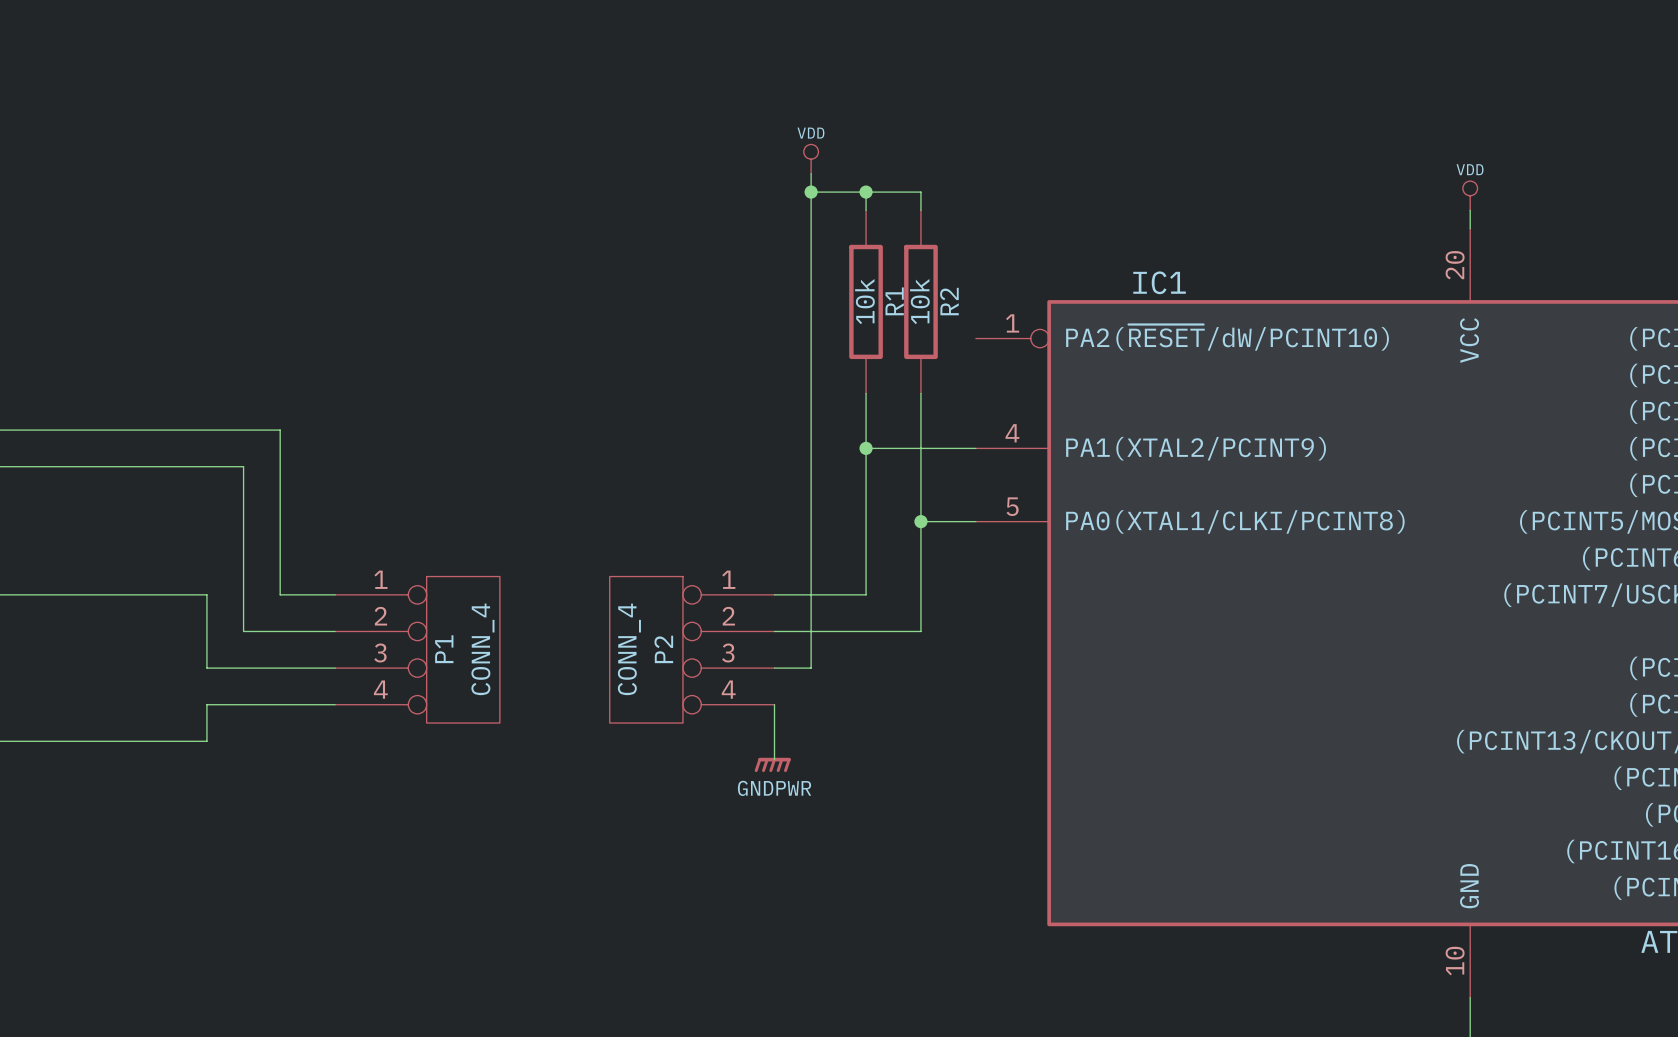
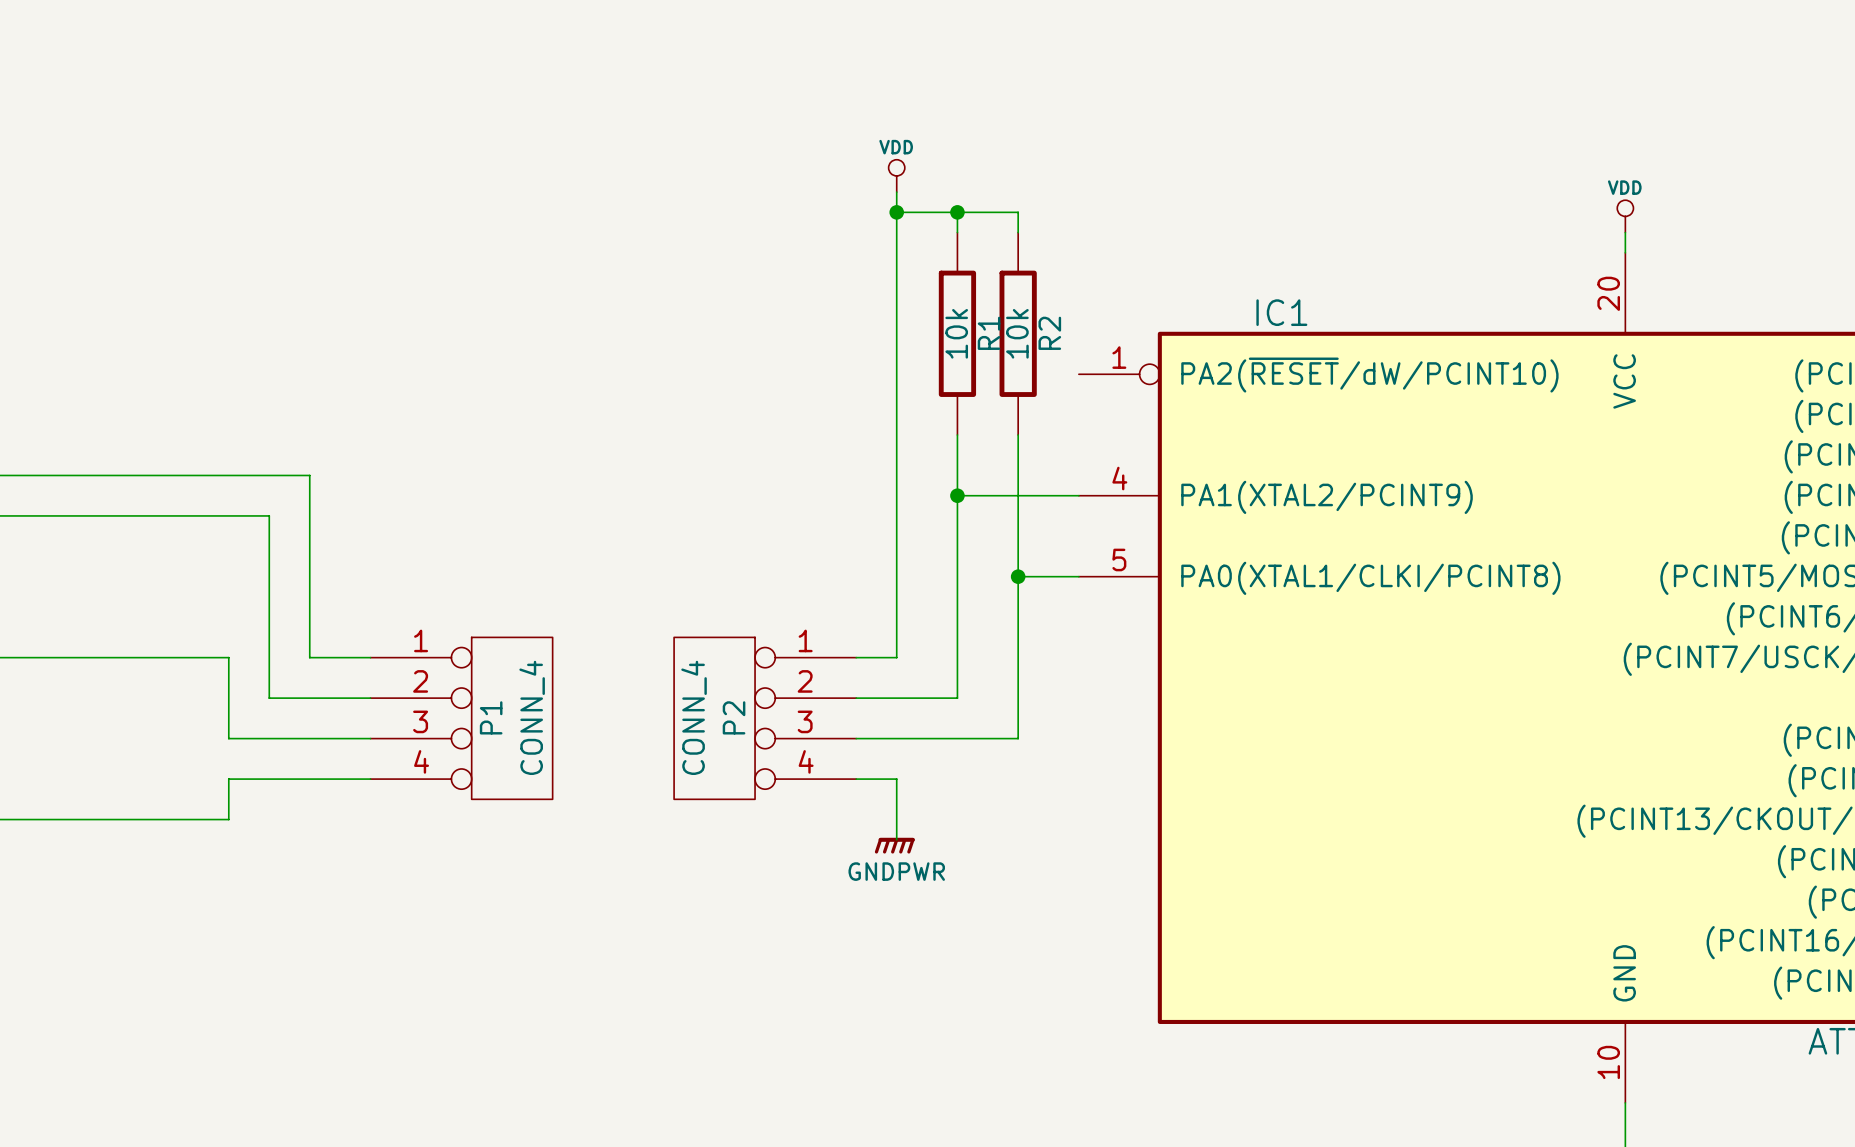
wire: (866, 594) (811, 594) (811, 668) -> (957, 657) (957, 698)
wire: (866, 631) (920, 631) -> (896, 738) (1018, 738) (1018, 698)
wire: (774, 704) (774, 759) -> (856, 779) (896, 779) (896, 839)
power symbol position: GNDPWR (772, 764) -> GNDPWR (894, 845)

